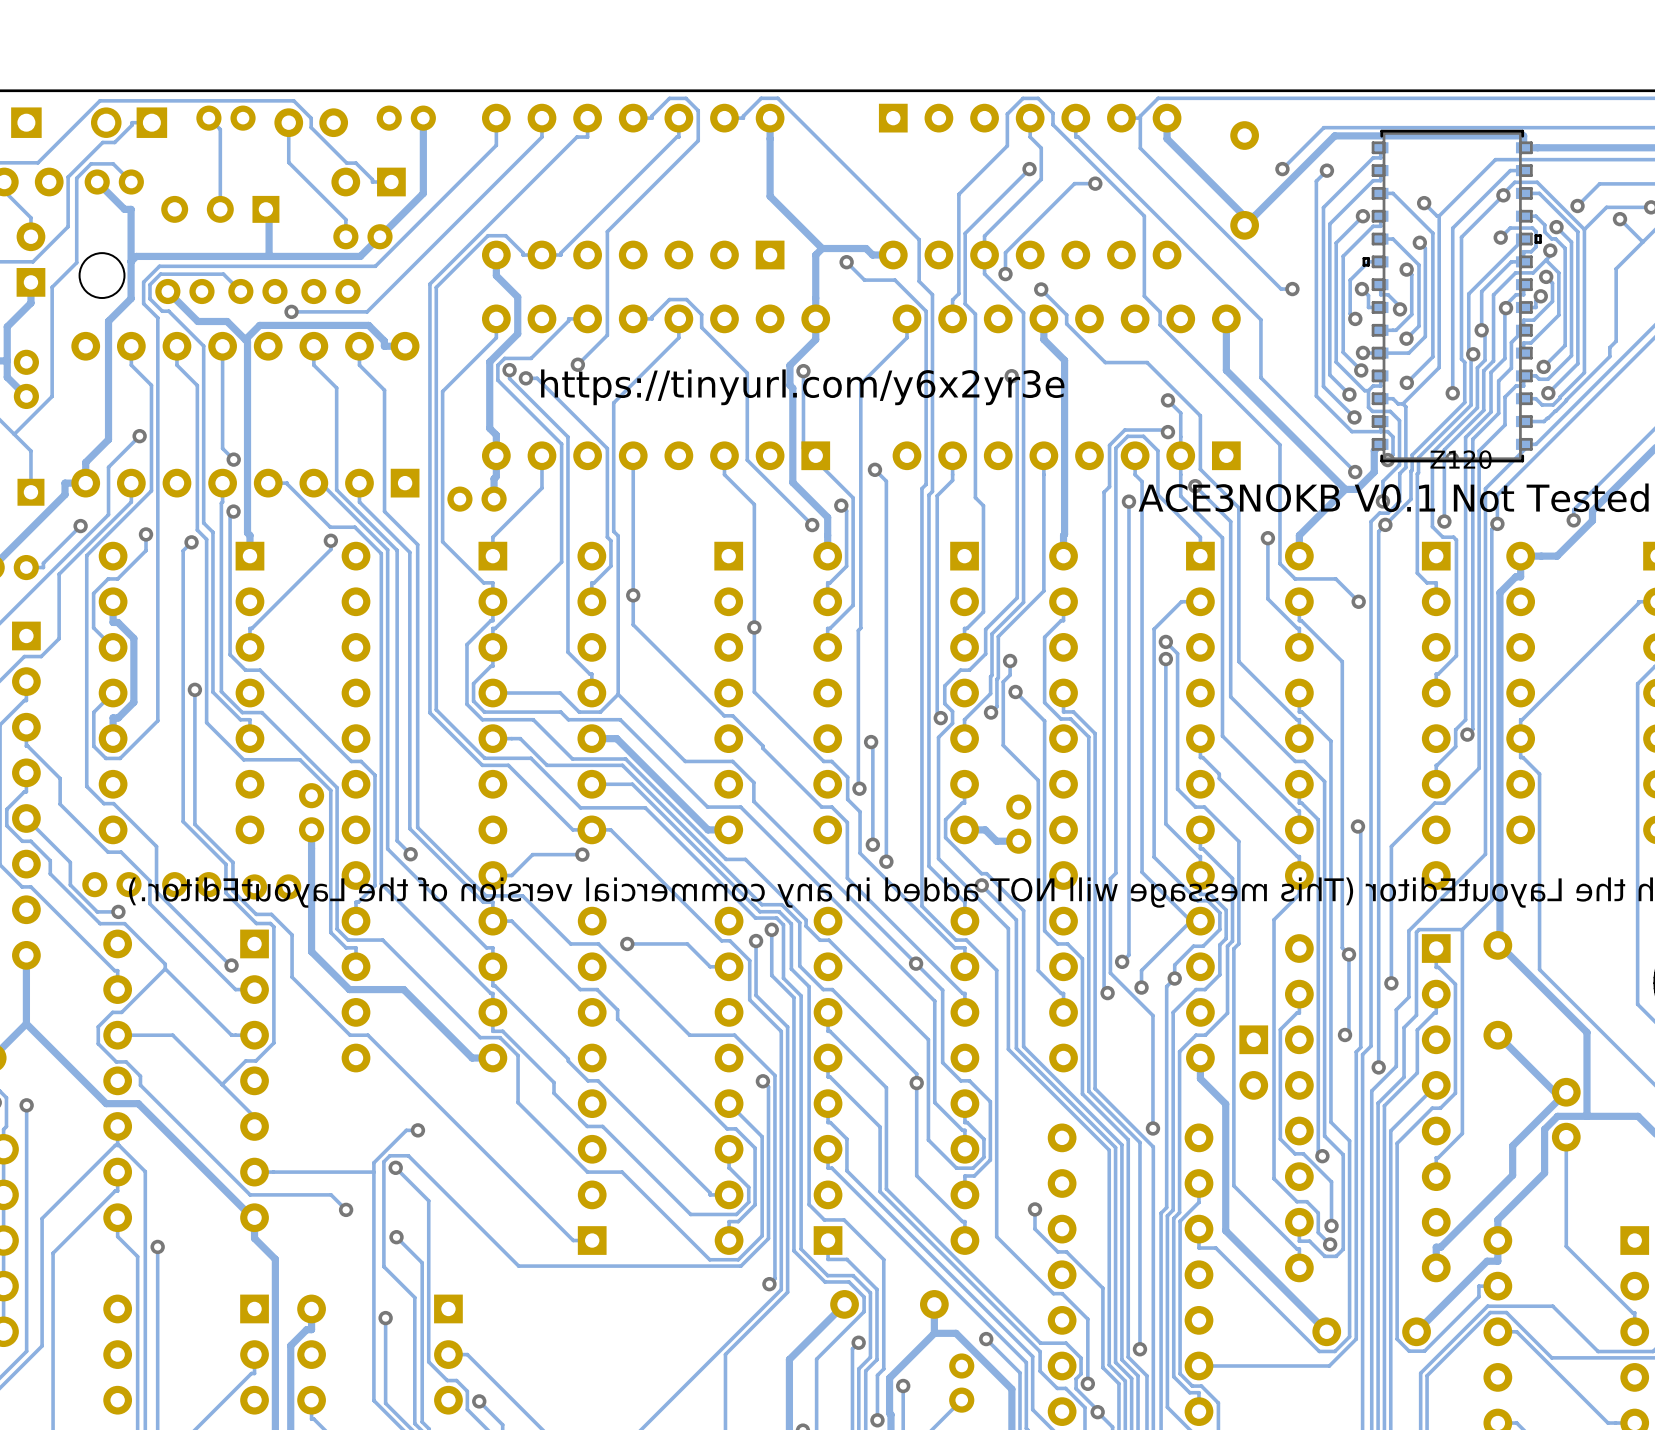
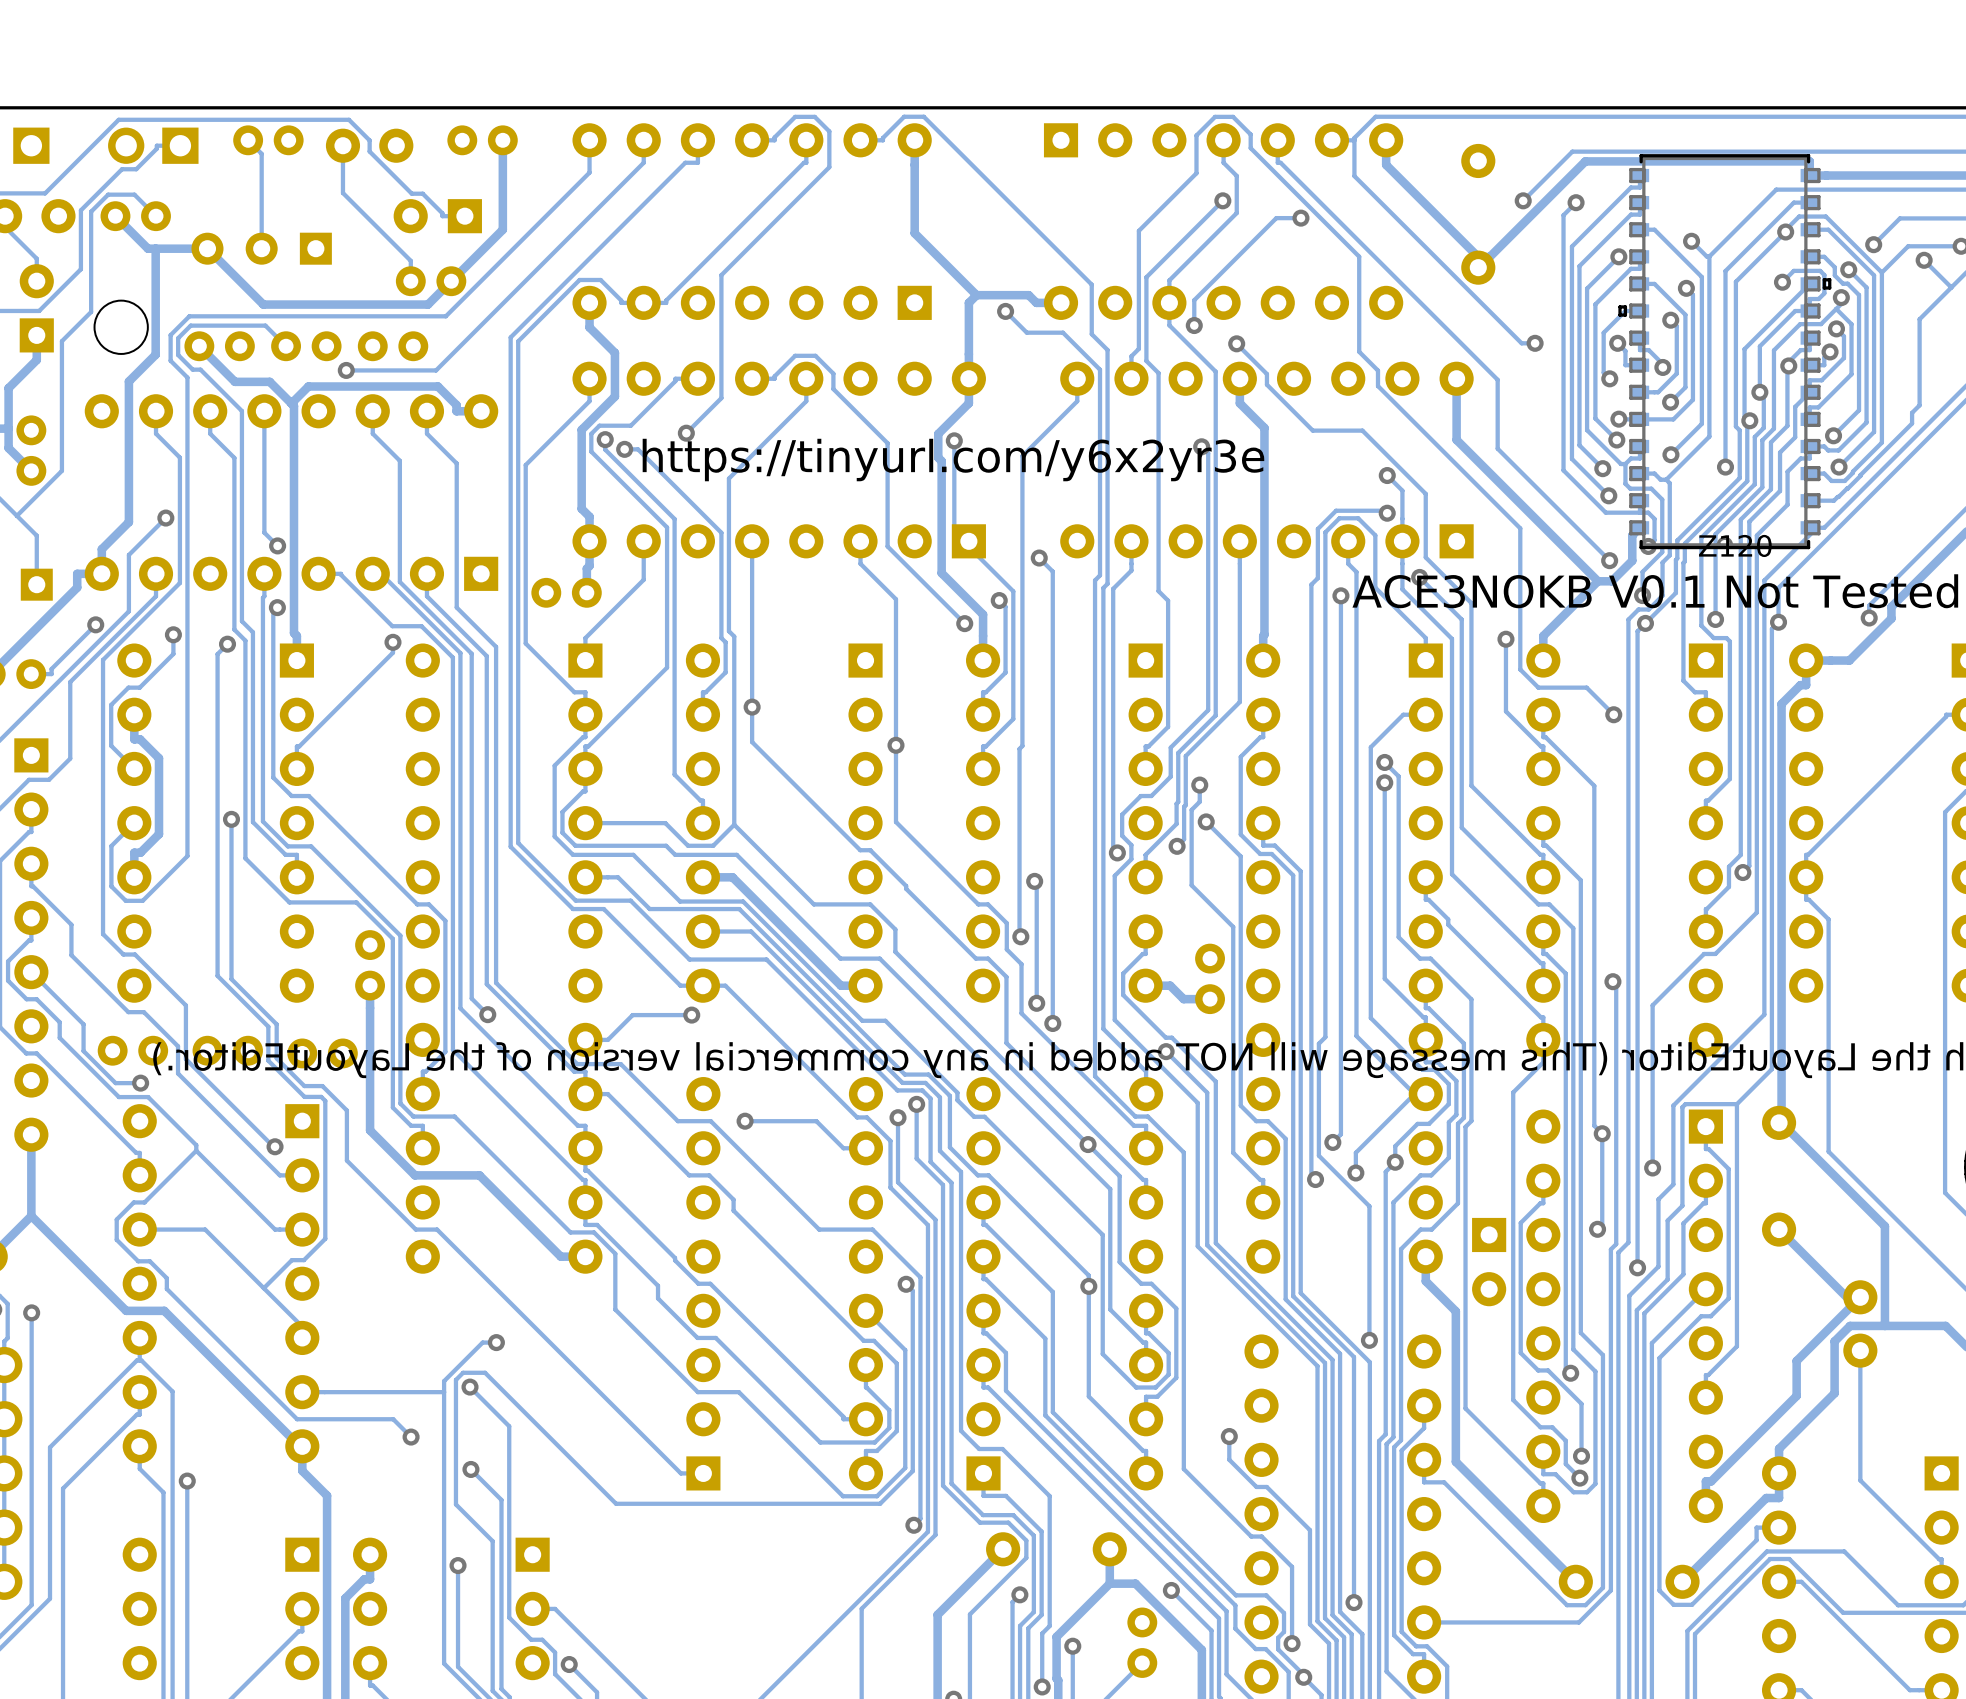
track: (265, 209) (269, 212) (269, 256) -> none
track: (221, 256) (136, 256) (131, 261) -> (263, 304) (207, 248) (155, 248)

